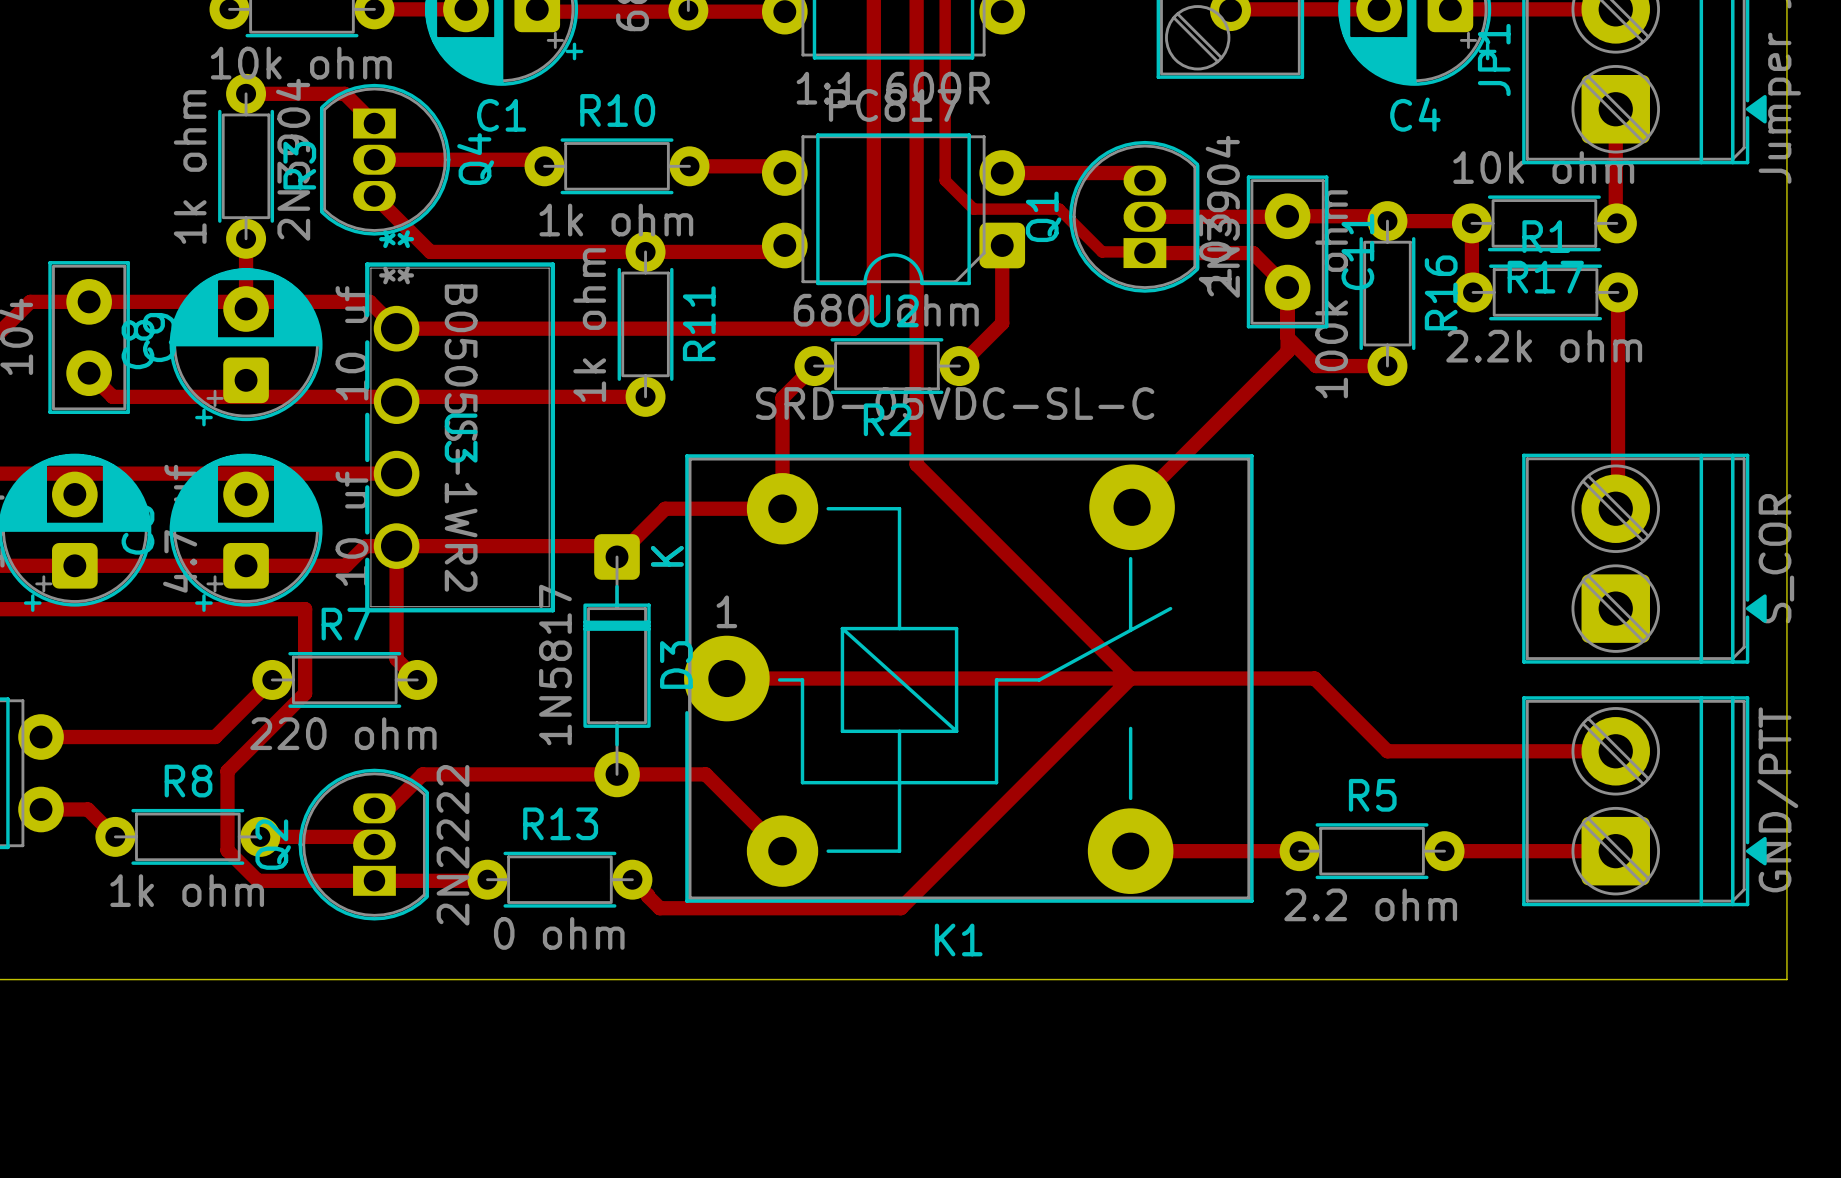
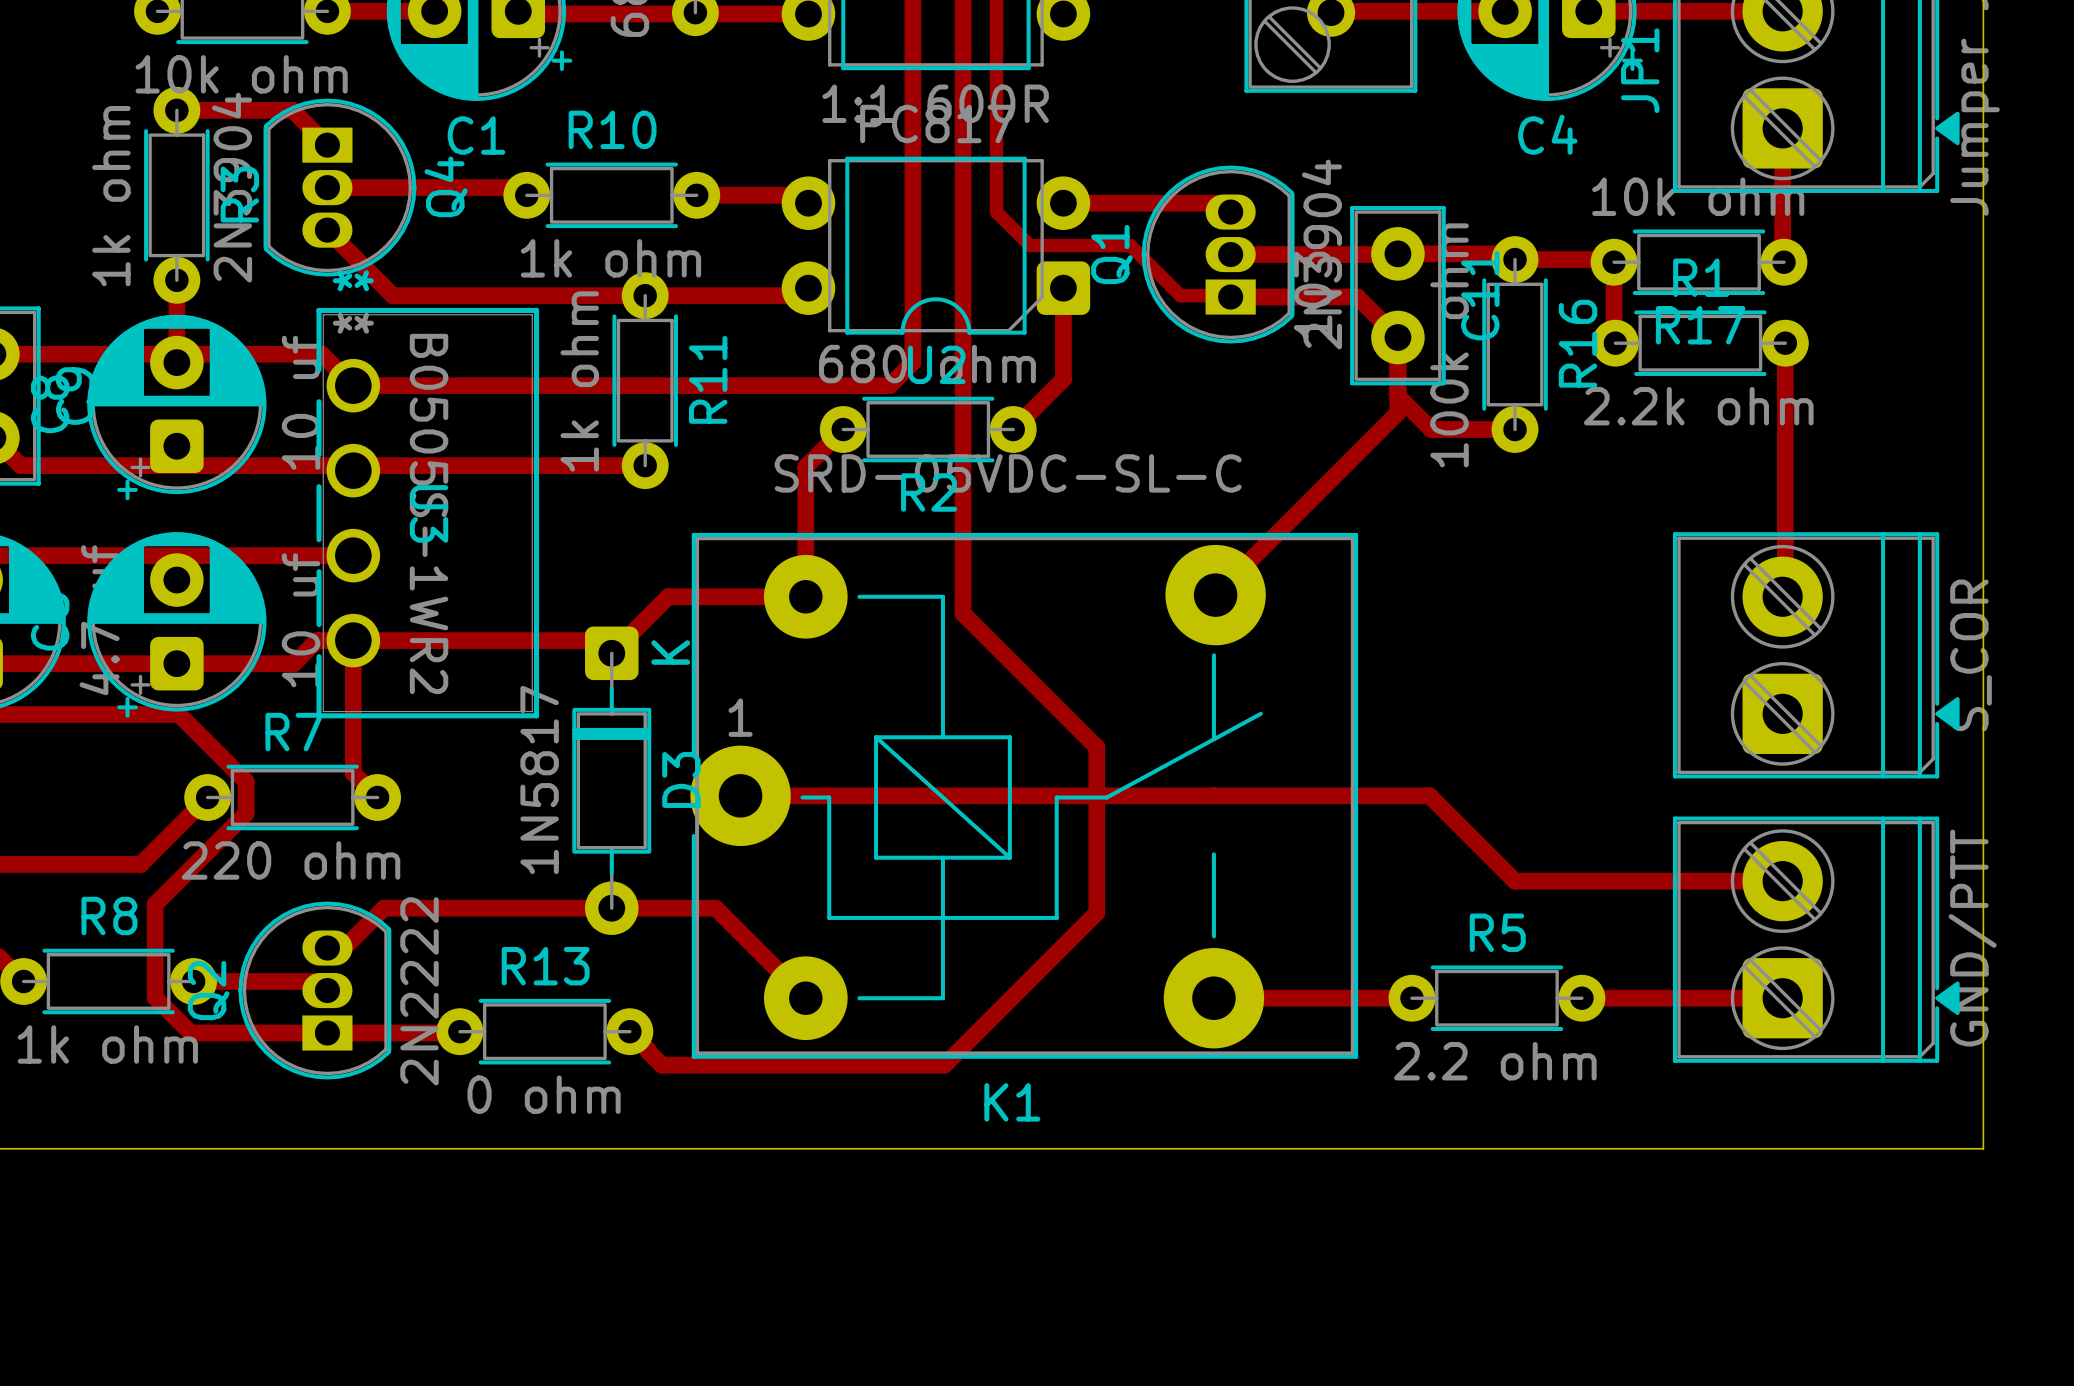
top track: (916, 464) (1130, 678) (1030, 778) -> (963, 544) (963, 613) (1096, 747) (1096, 912)
top track: (247, 609) (305, 609) (305, 666) -> (179, 714) (246, 781)

